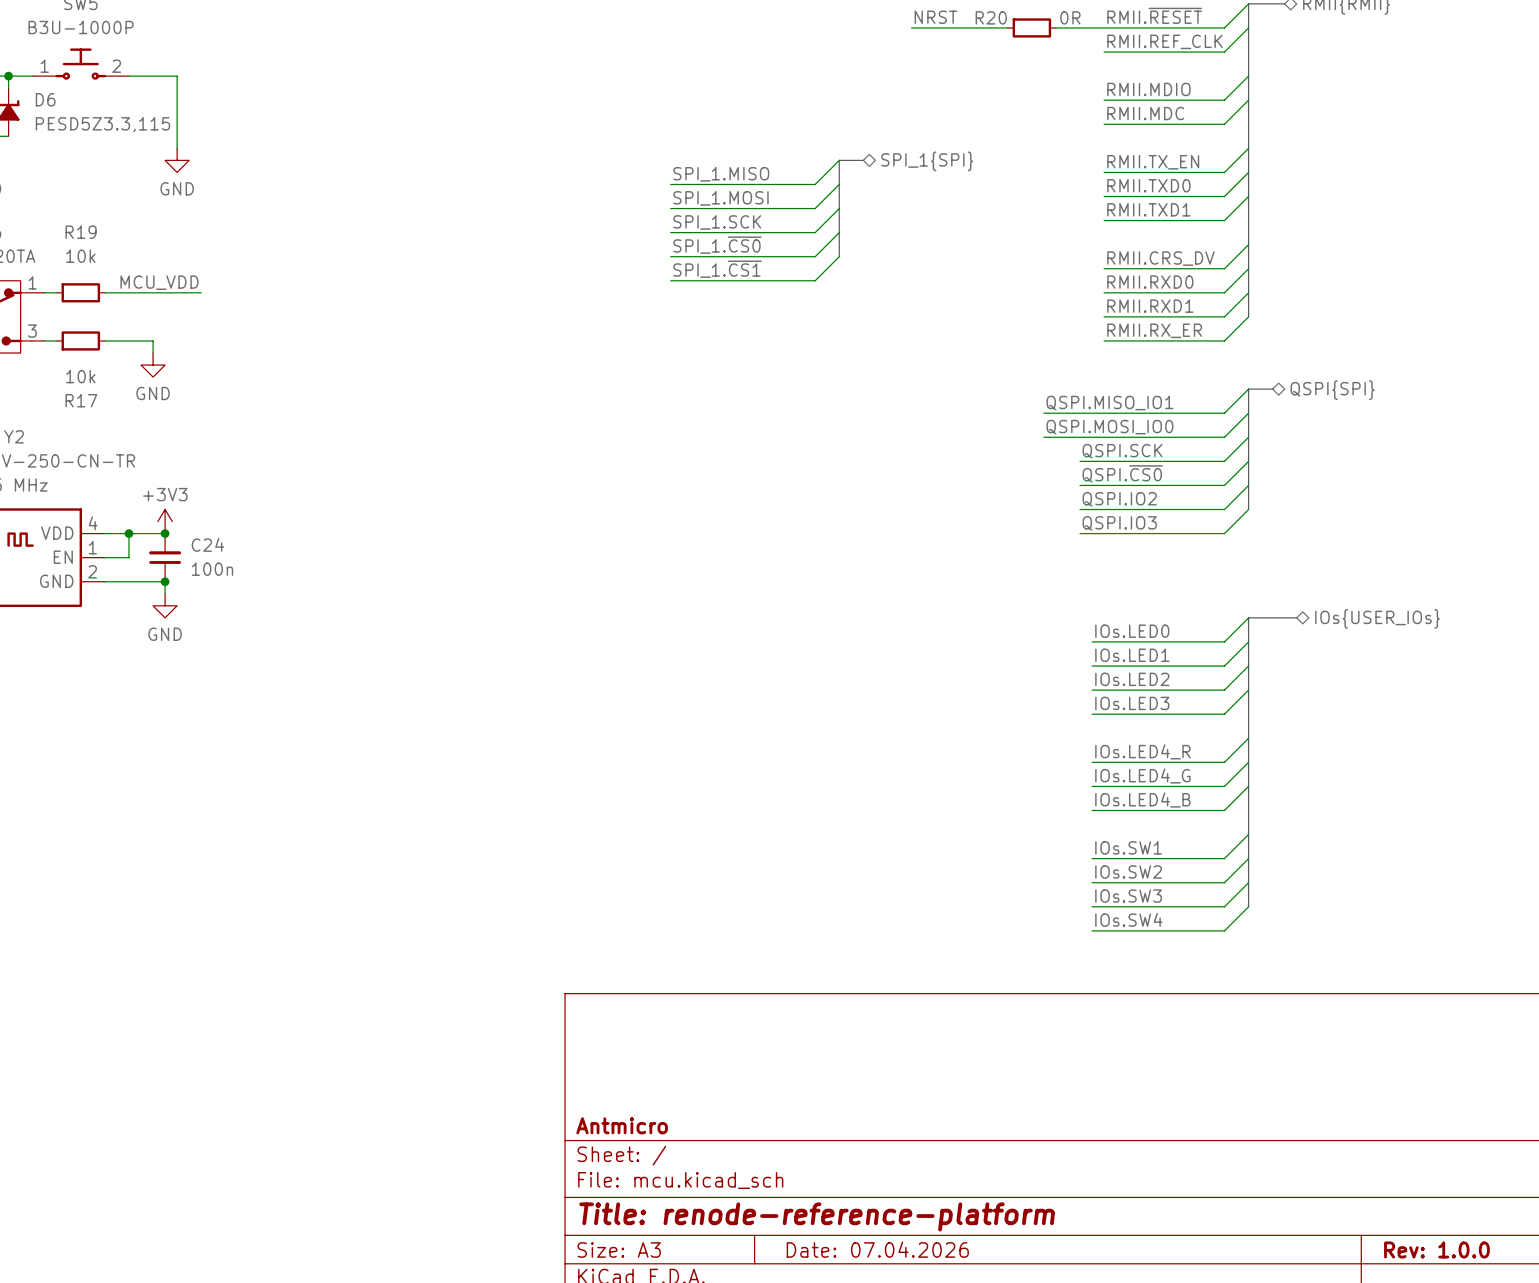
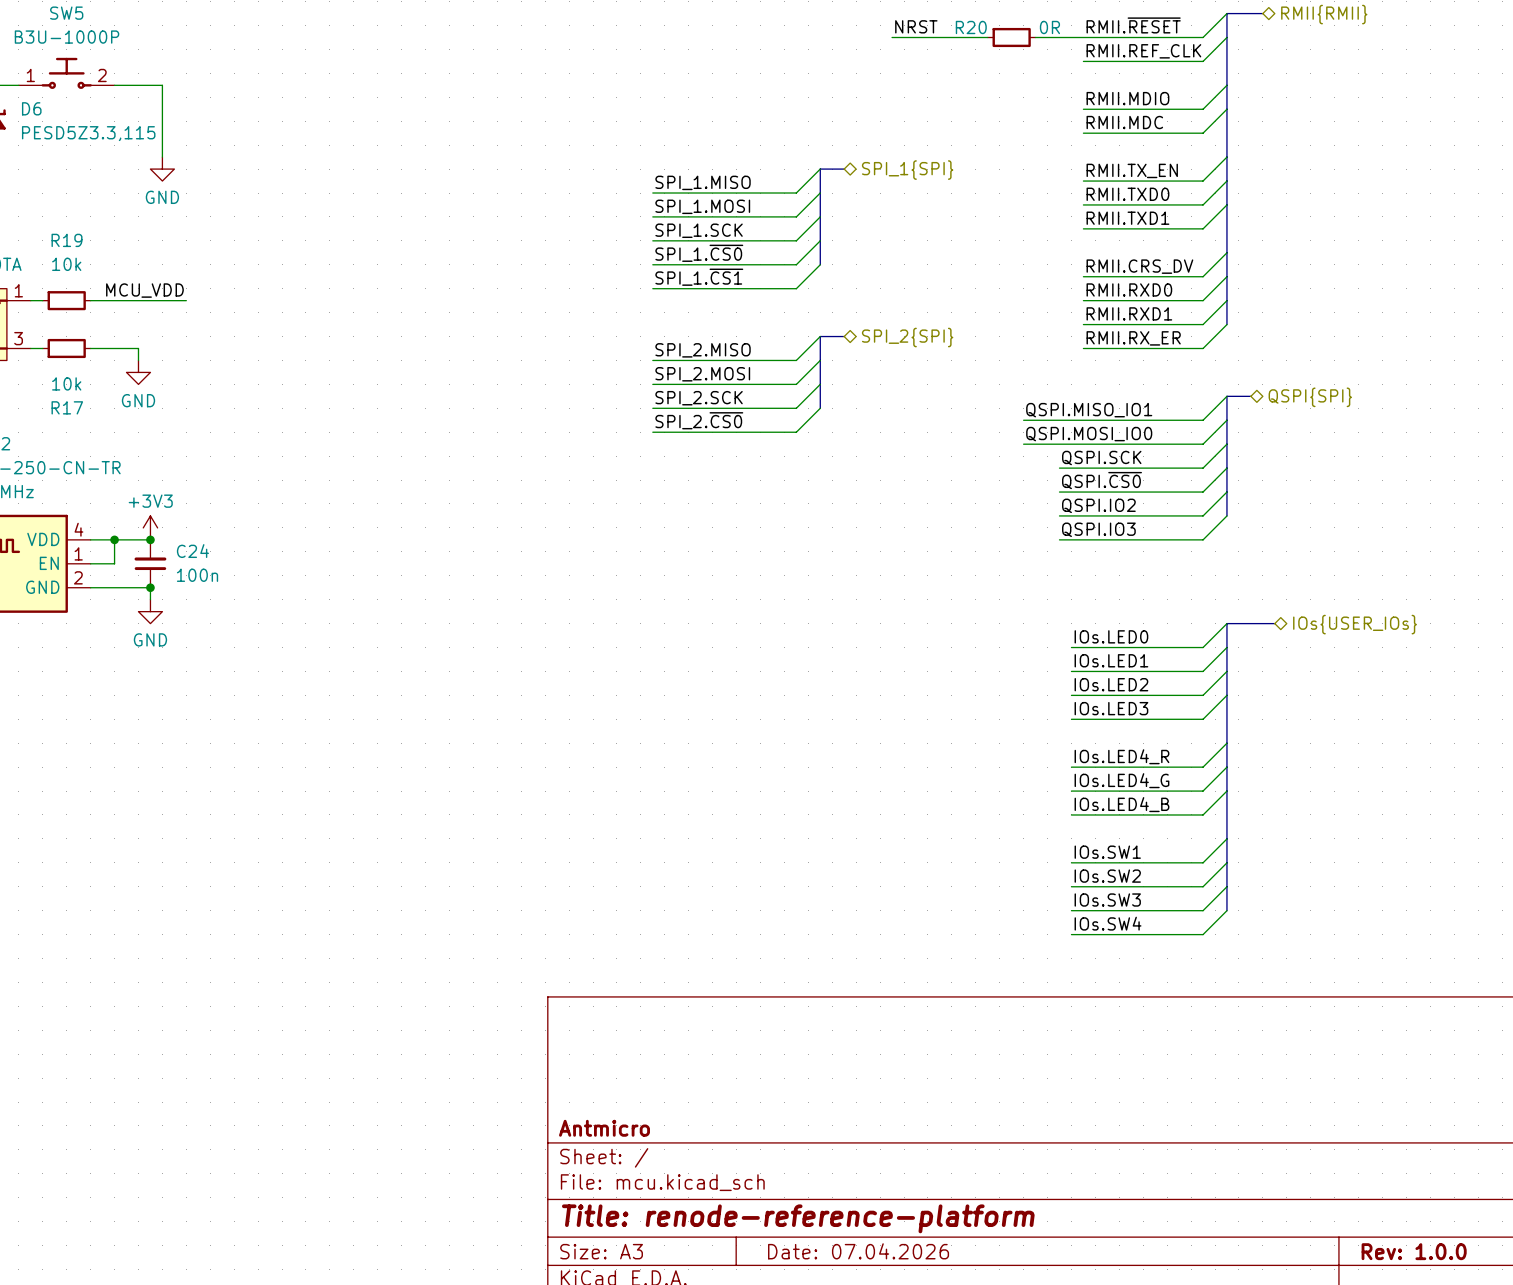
wire: none -> (820, 336) (796, 360) (652, 360)
bus: none -> (844, 336) (820, 336) (820, 408)
hierarchical label: none -> SPI_2{SPI} (907, 337)
label: none -> SPI_2.MISO (703, 350)
wire: none -> (820, 360) (796, 384) (652, 384)
label: none -> SPI_2.MOSI (702, 374)
wire: none -> (820, 384) (796, 408) (652, 408)
label: none -> SPI_2.SCK (699, 398)
wire: none -> (820, 408) (796, 432) (652, 432)
label: none -> SPI_2.~{CS0} (699, 420)

